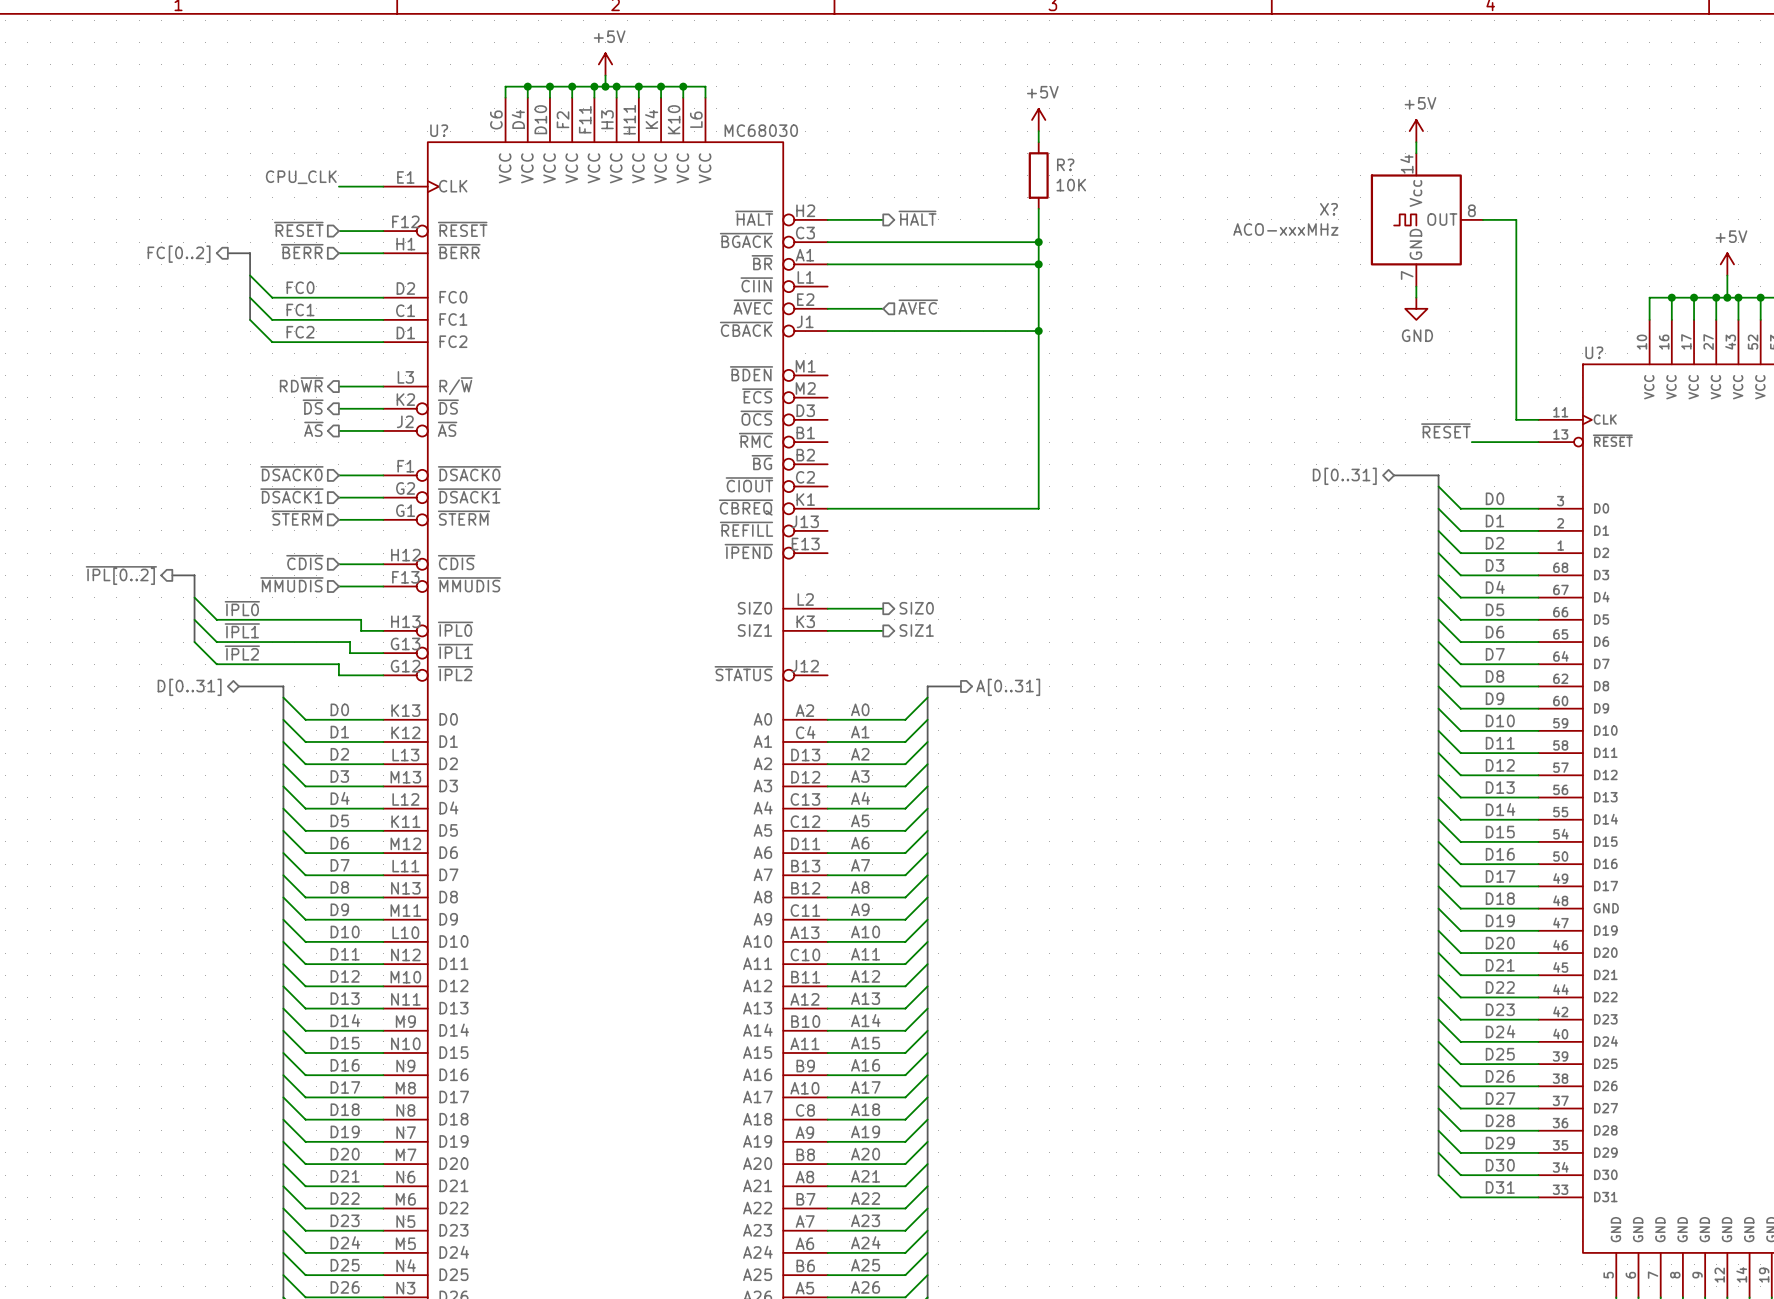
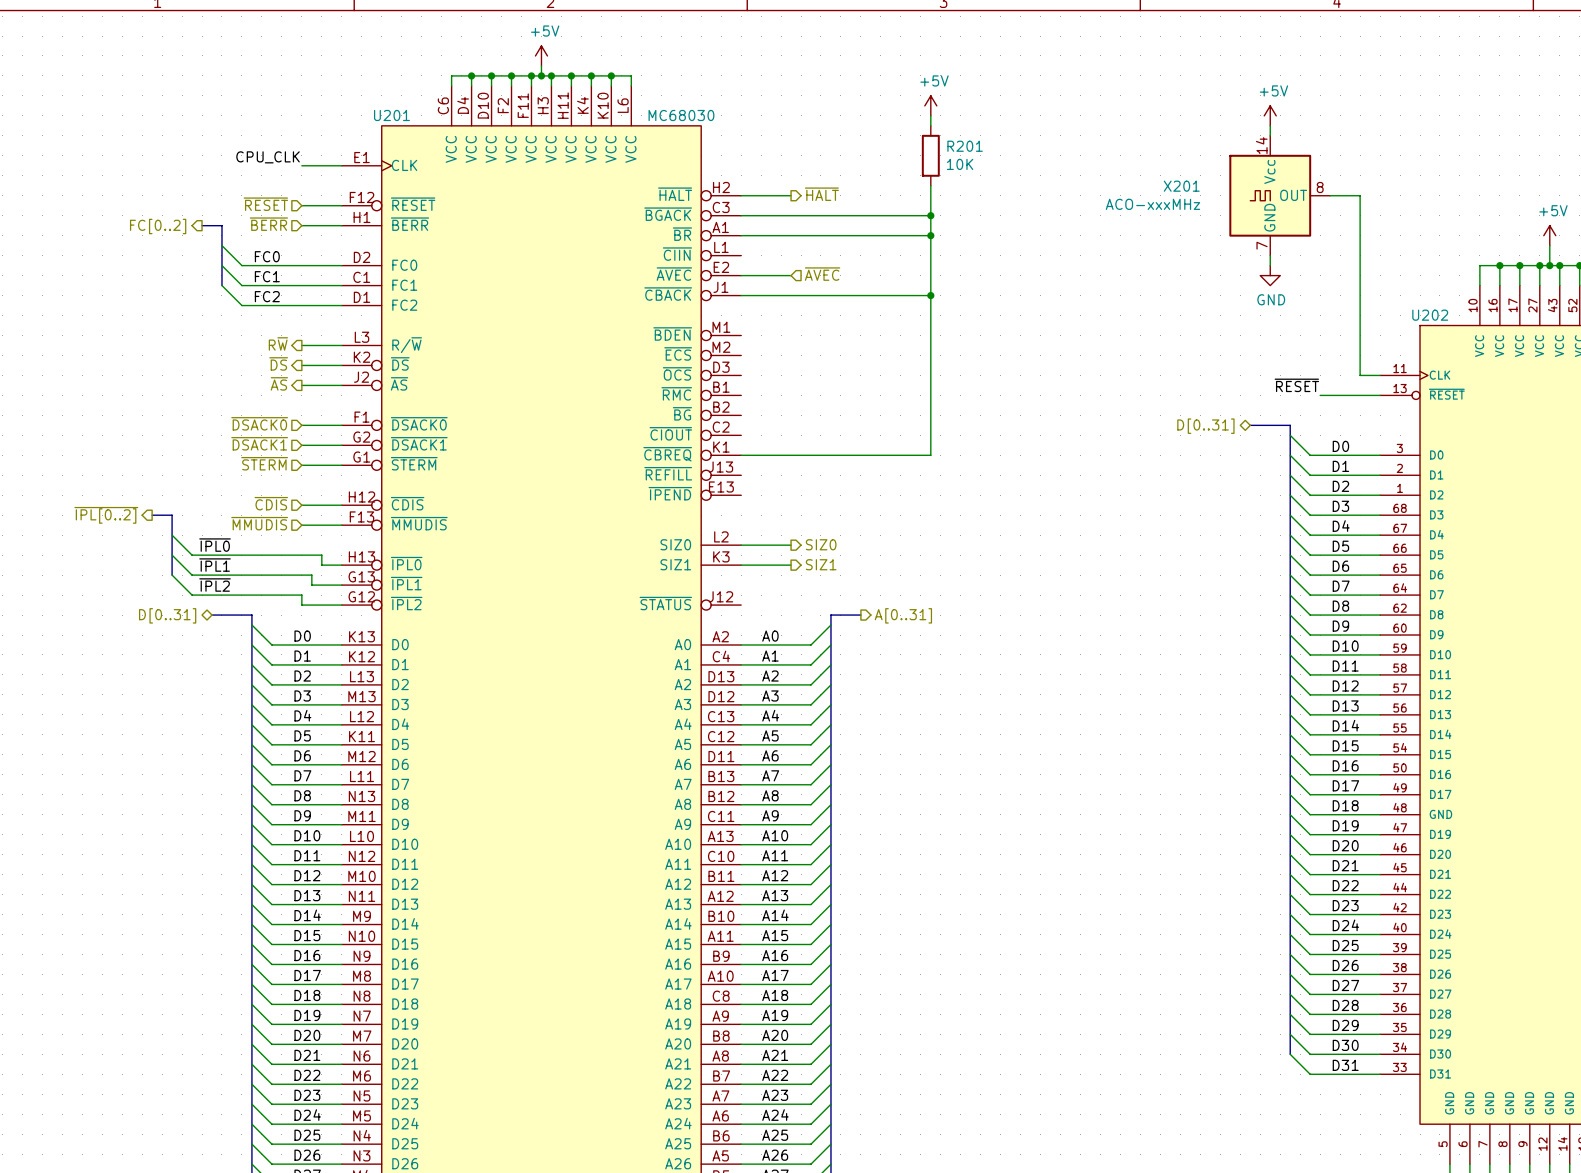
U? name: U? (439, 130) -> U201 (391, 115)
R? name: R? (1065, 164) -> R201 (965, 146)
X? name: X? (1328, 209) -> X201 (1181, 186)
U? name: U? (1594, 352) -> U202 (1430, 315)
hierarchical label: RD~{WR} (301, 384) -> R~{W} (278, 343)

